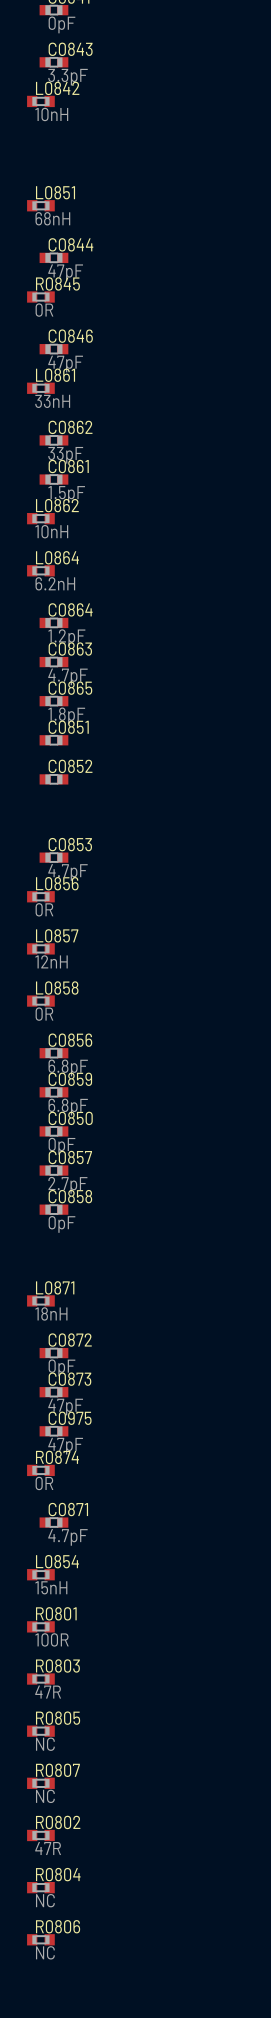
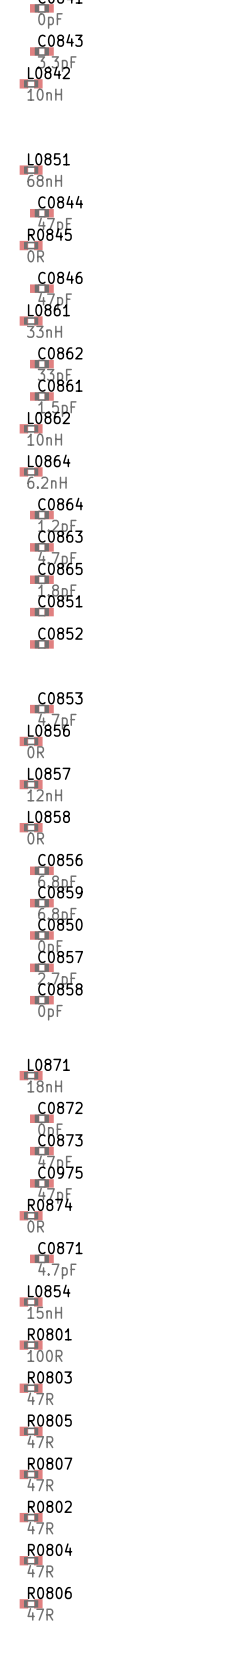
R0805 value: NC (45, 1744) -> 47R (40, 1441)
R0807 value: NC (45, 1796) -> 47R (40, 1485)
R0804 value: NC (45, 1900) -> 47R (40, 1571)
R0806 value: NC (45, 1952) -> 47R (40, 1614)

